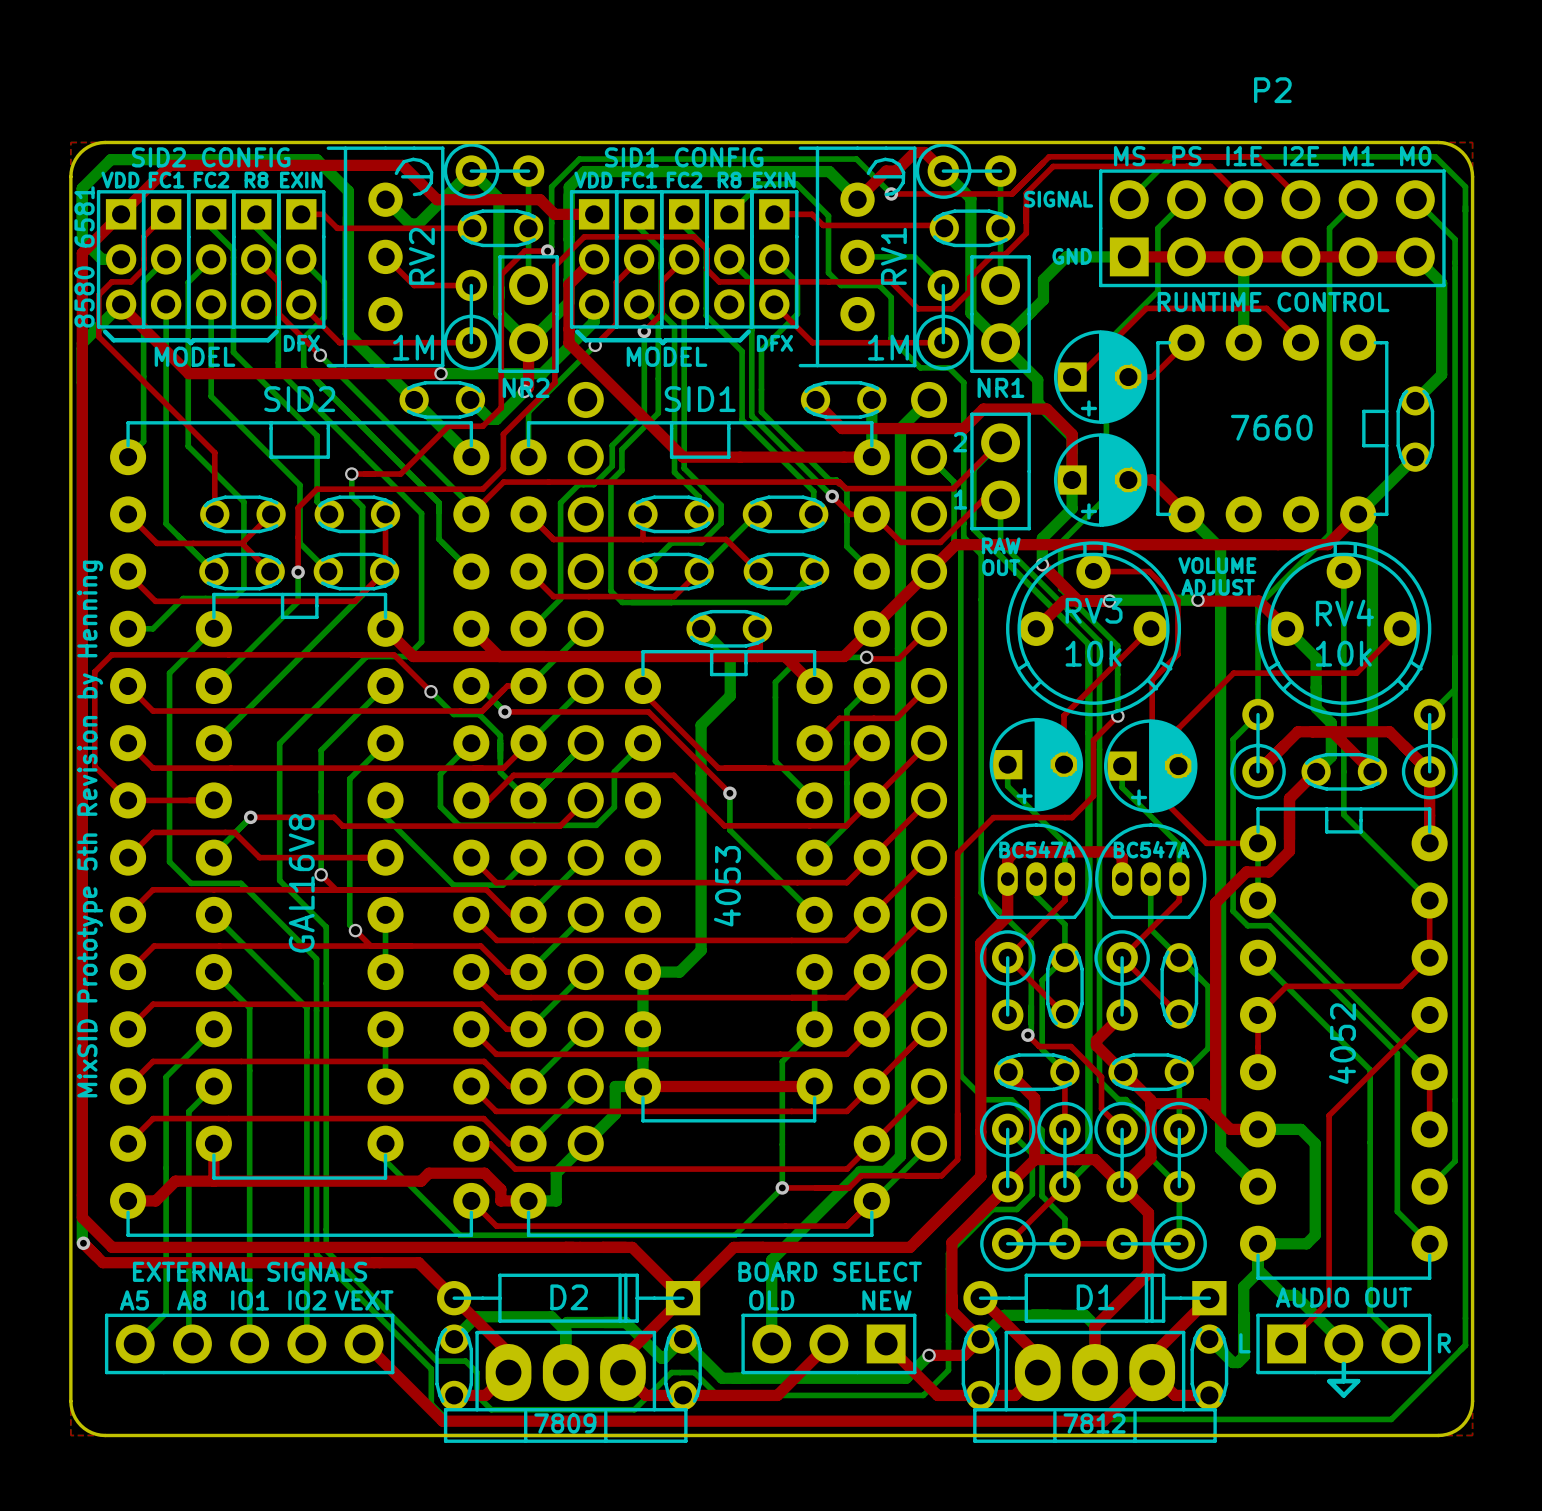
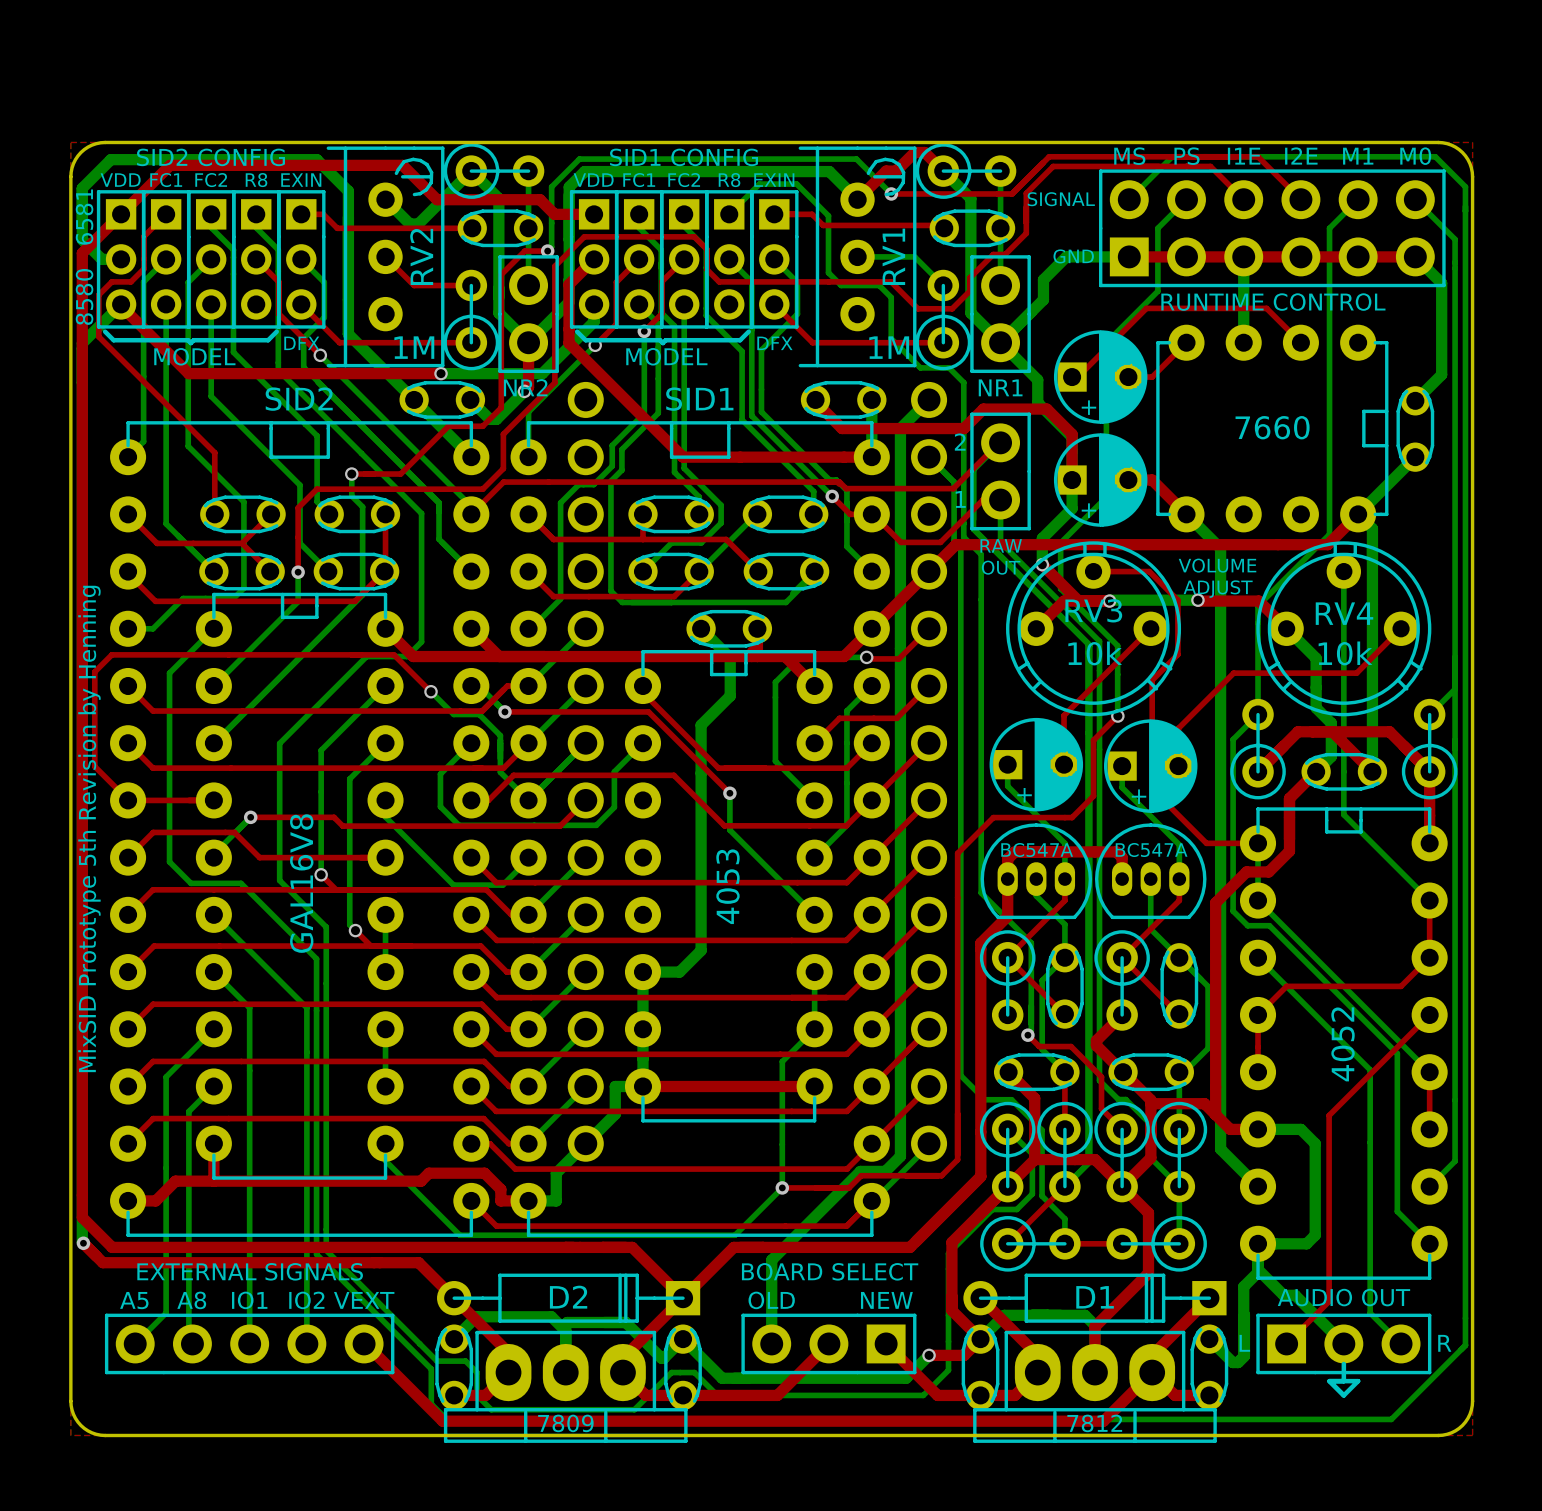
P2 name: P2 (1272, 90) -> none

